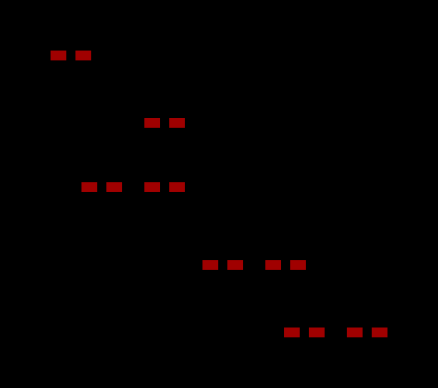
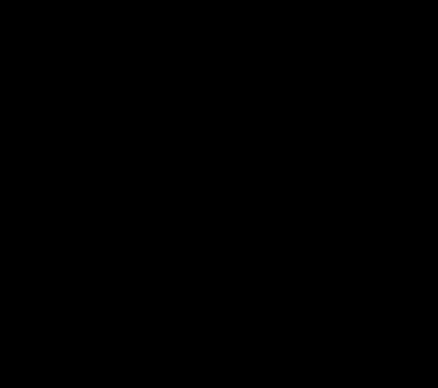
part: (70, 55) -> none
part: (164, 122) -> none
part: (101, 187) -> none
part: (164, 187) -> none
part: (222, 264) -> none
part: (285, 264) -> none
part: (304, 332) -> none
part: (367, 332) -> none

